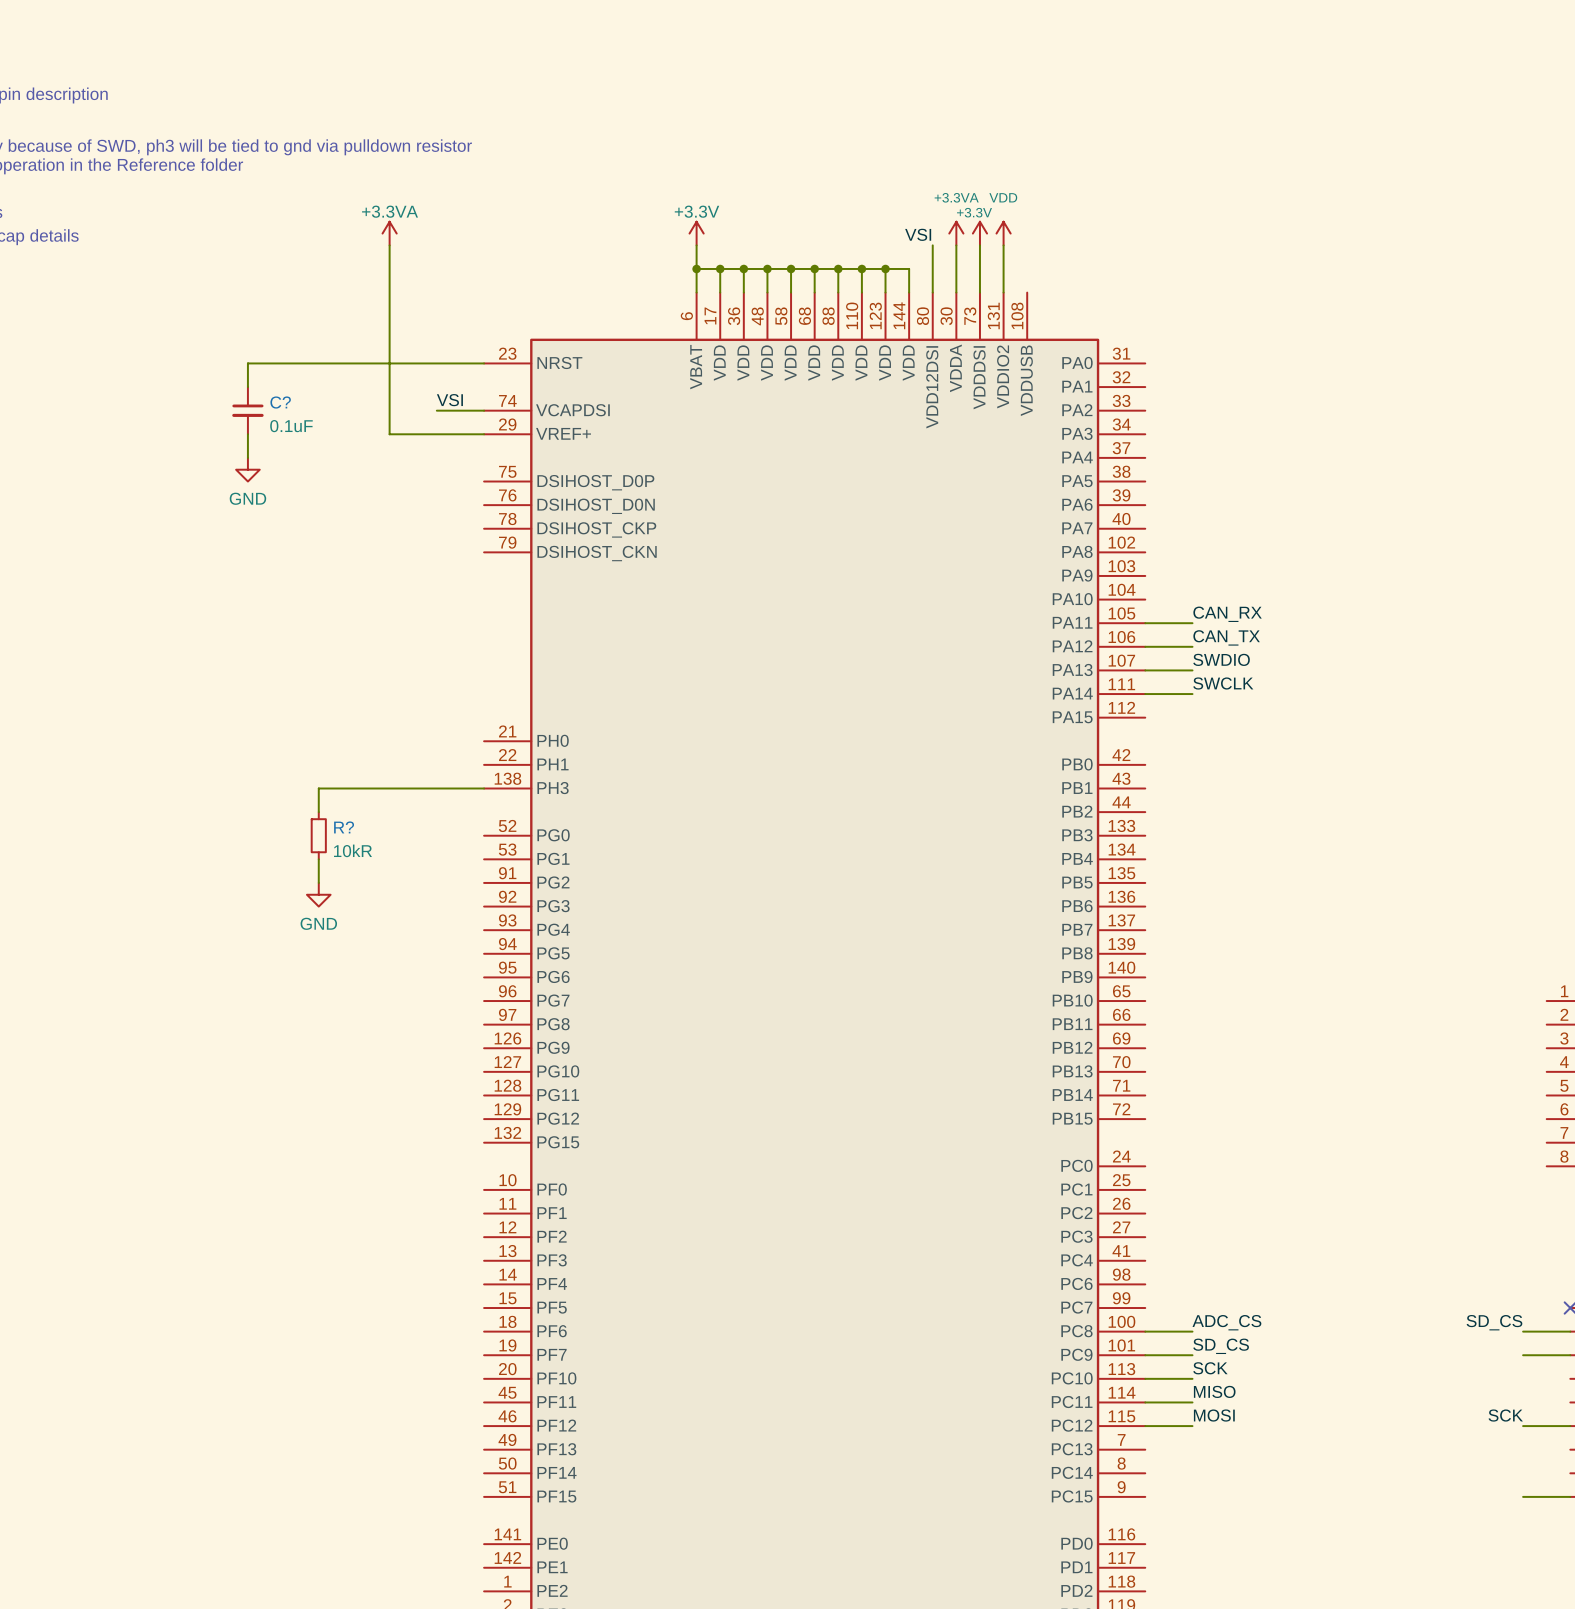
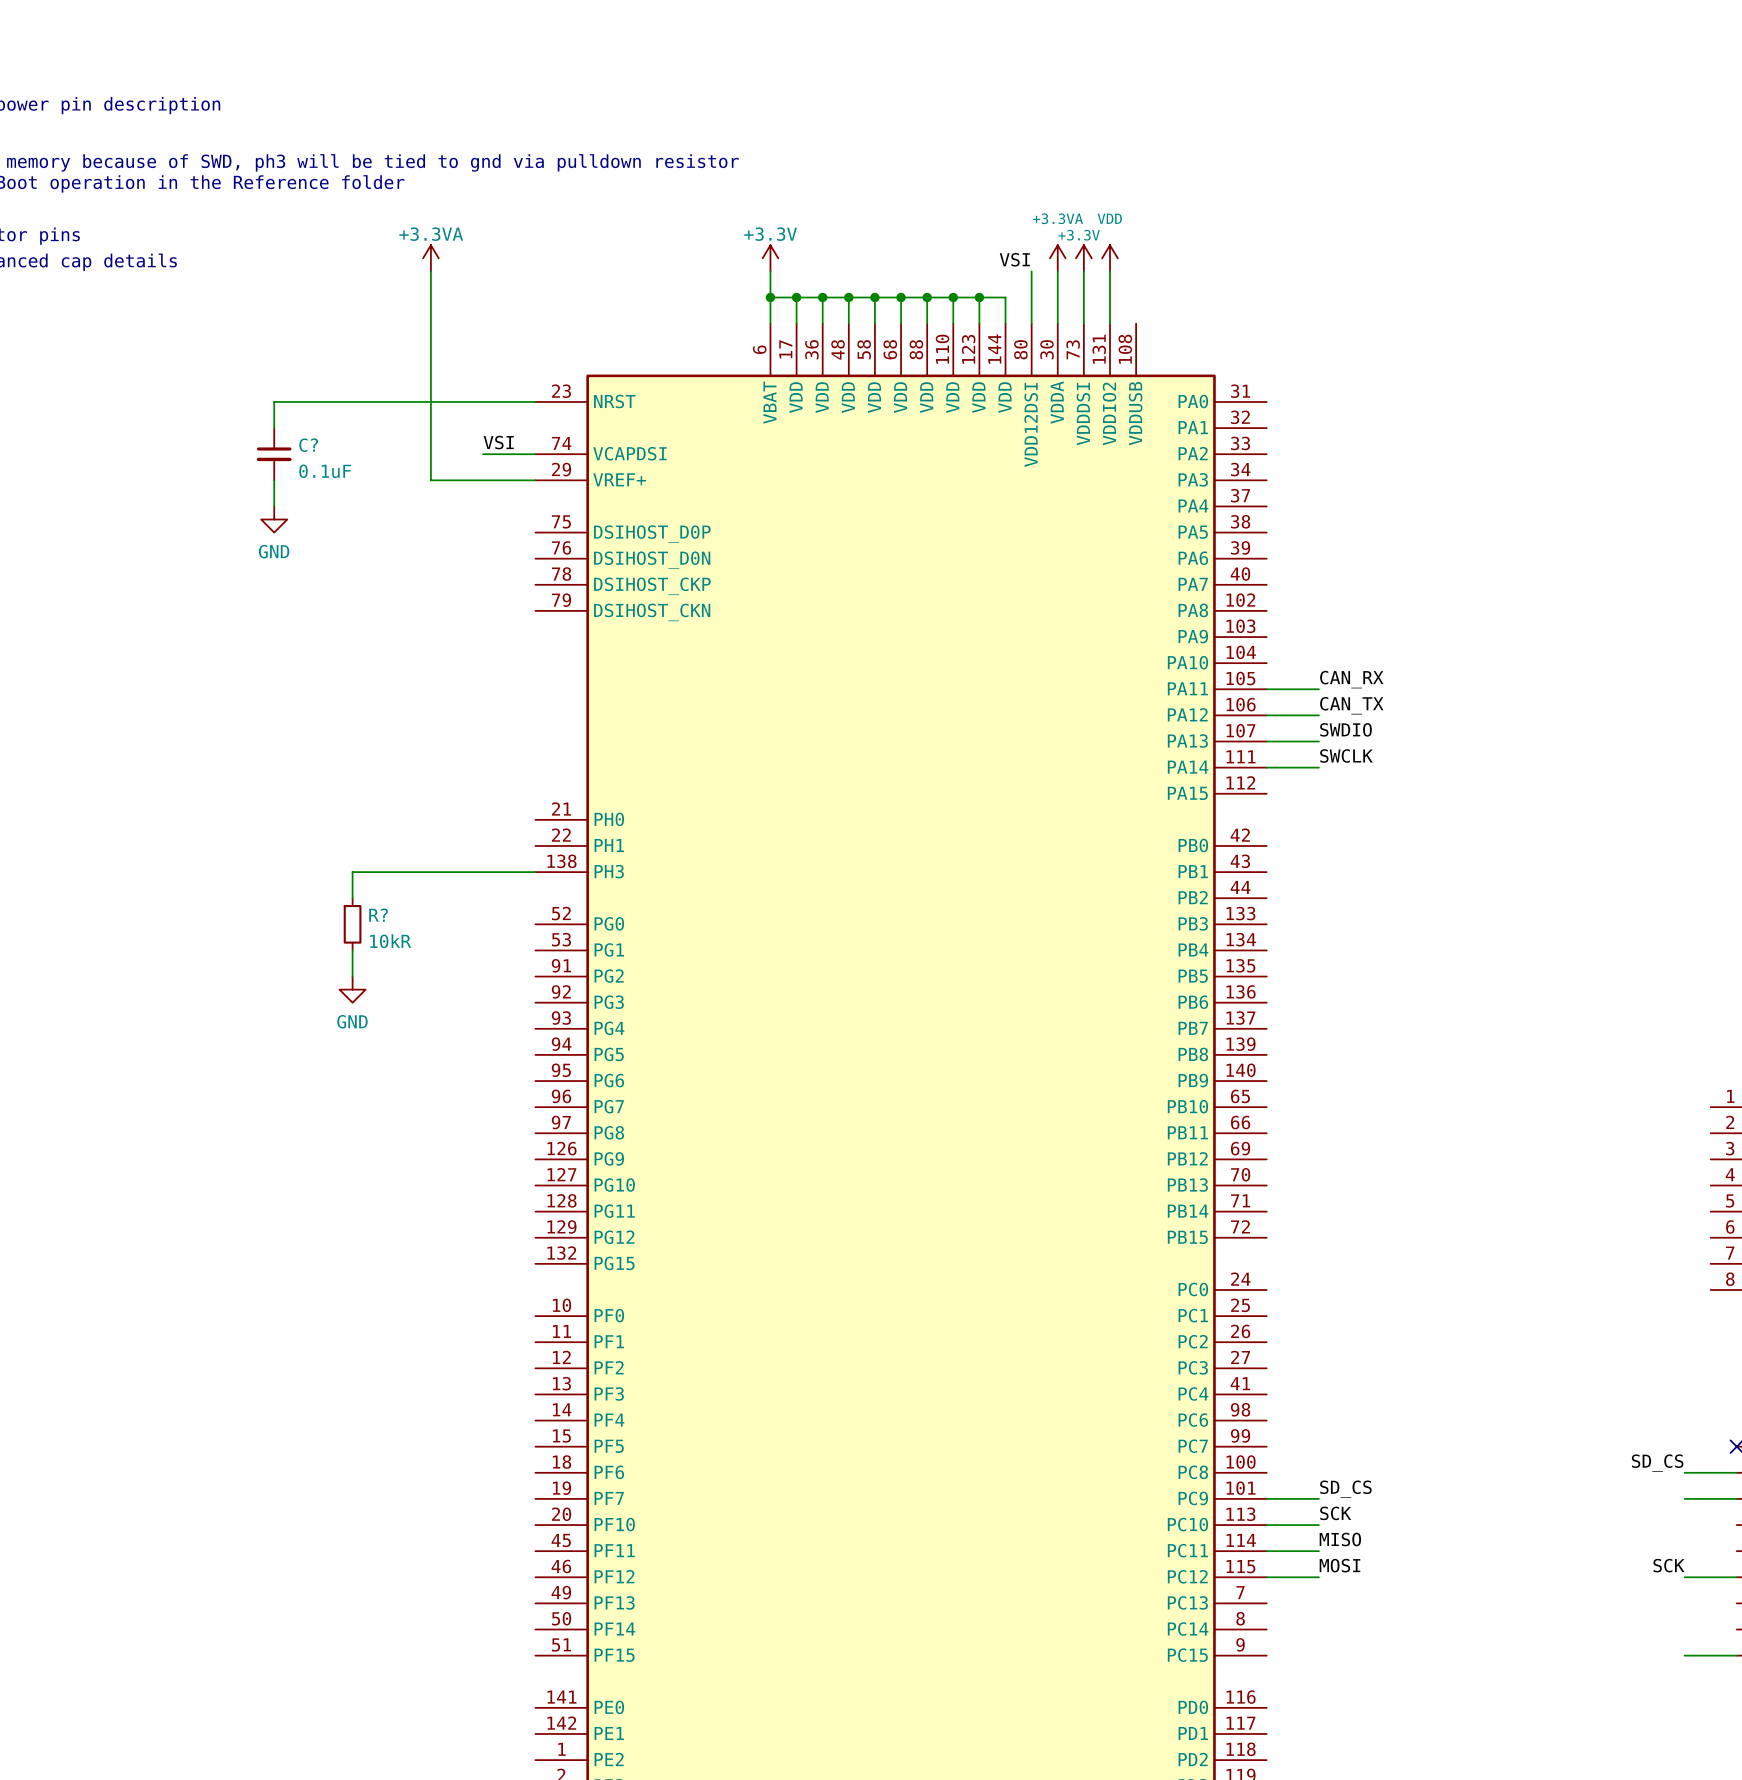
label: ADC_CS (1226, 1322) -> none
wire: (1145, 1331) (1192, 1331) -> none

